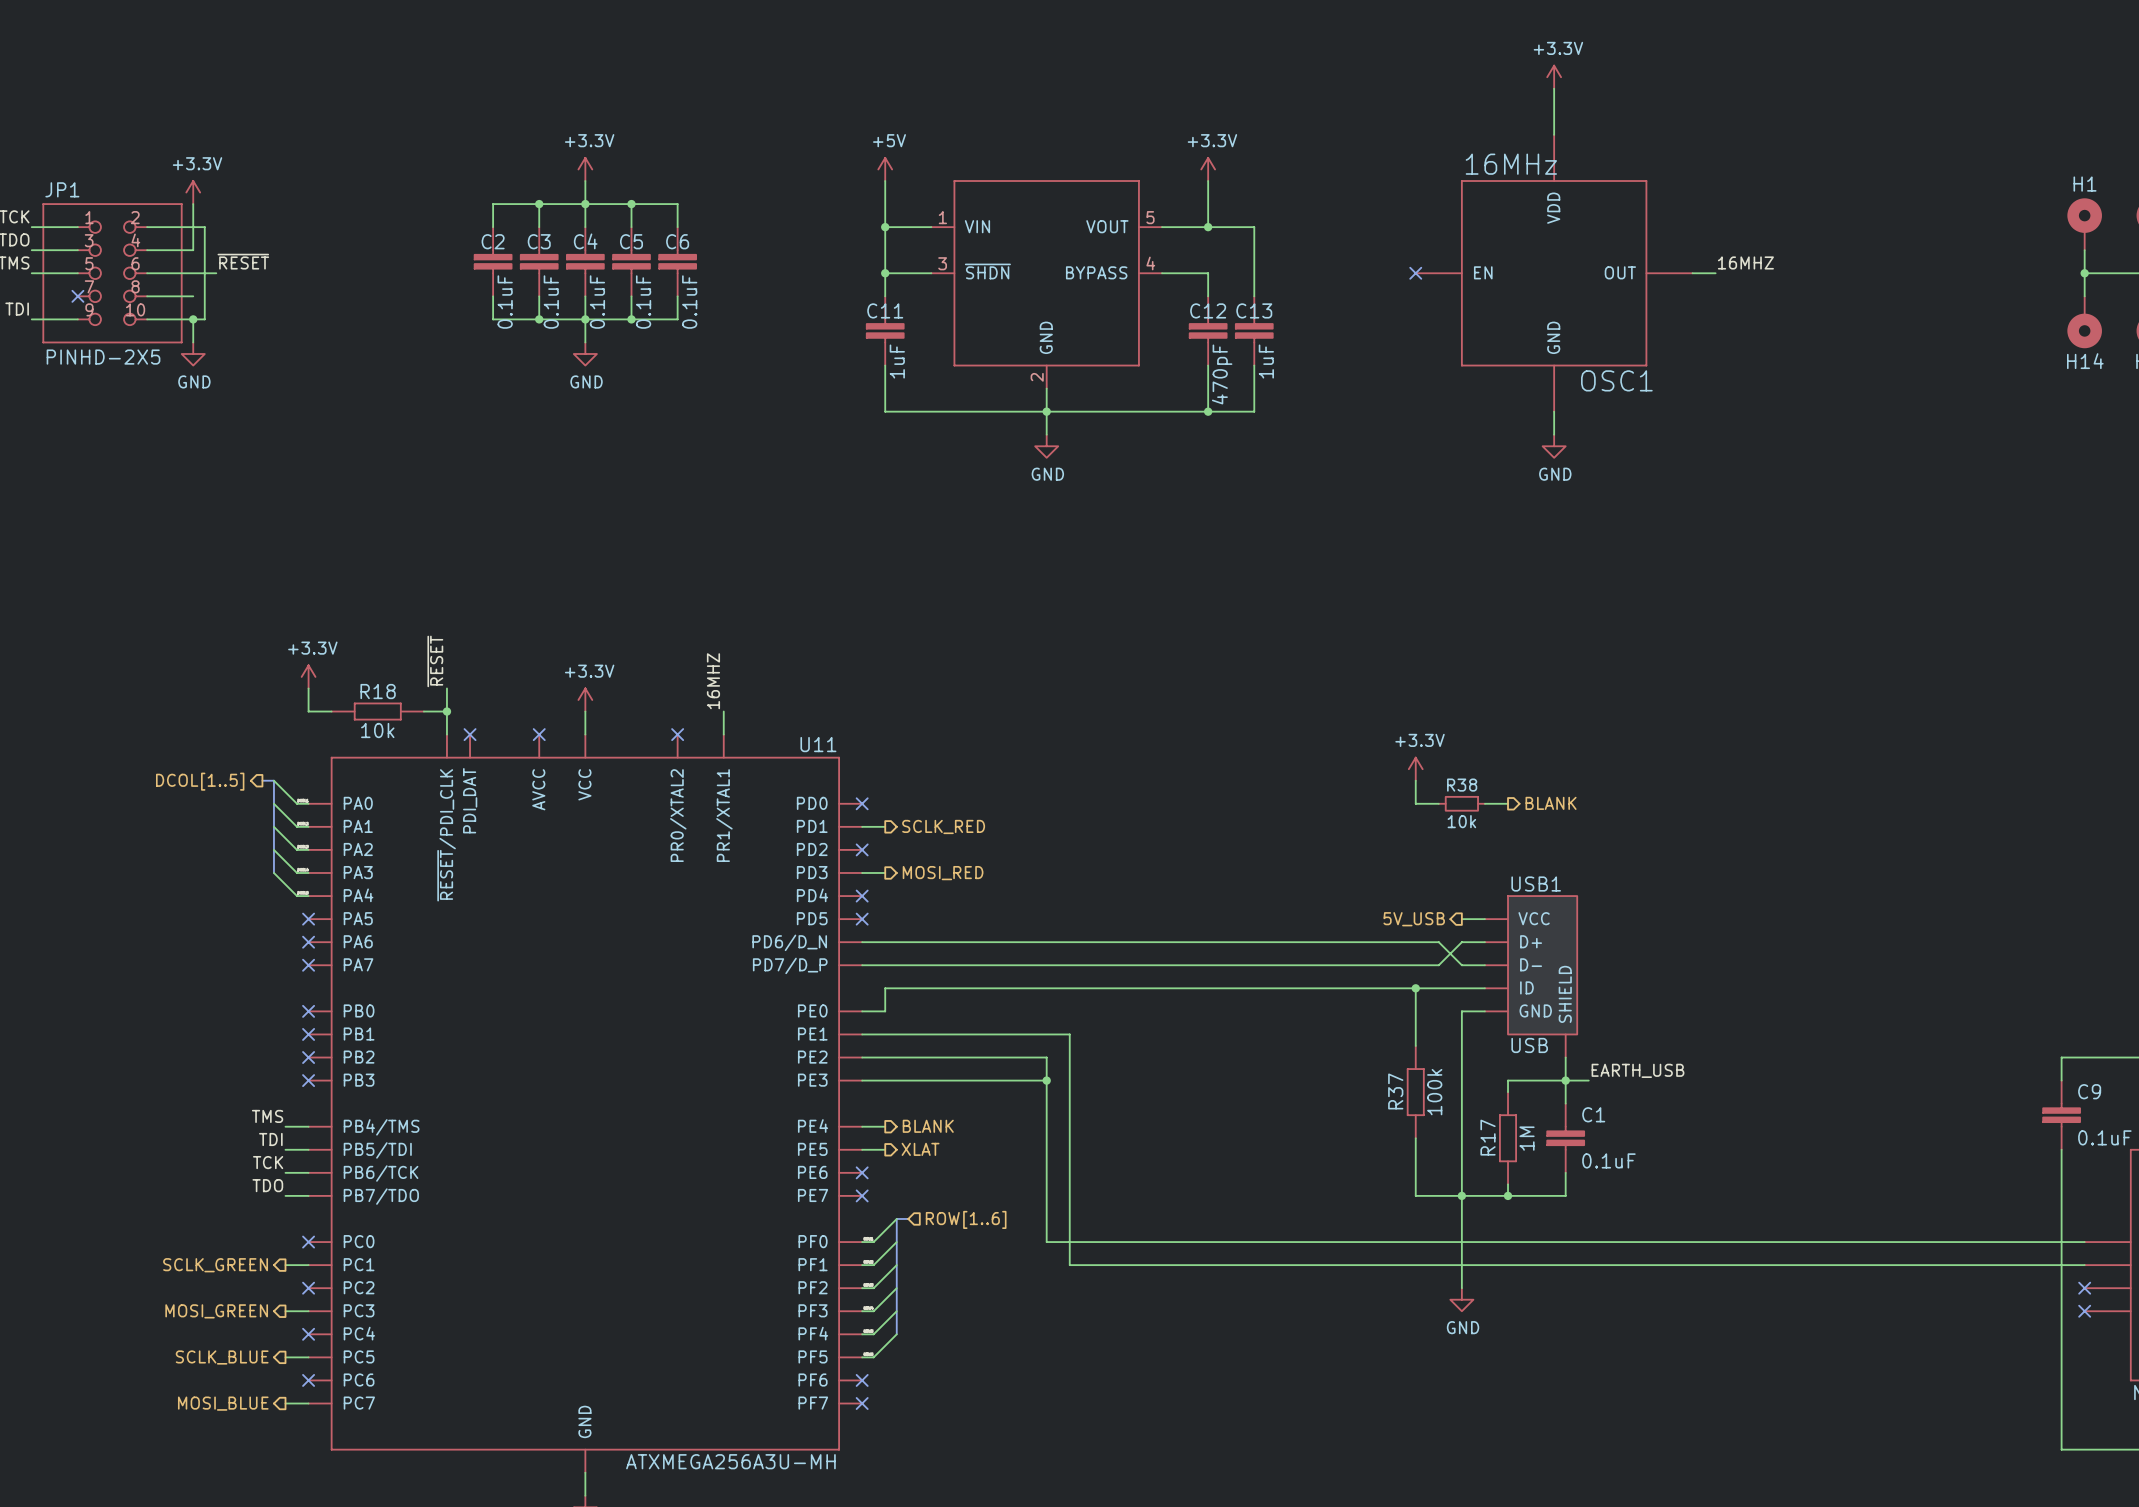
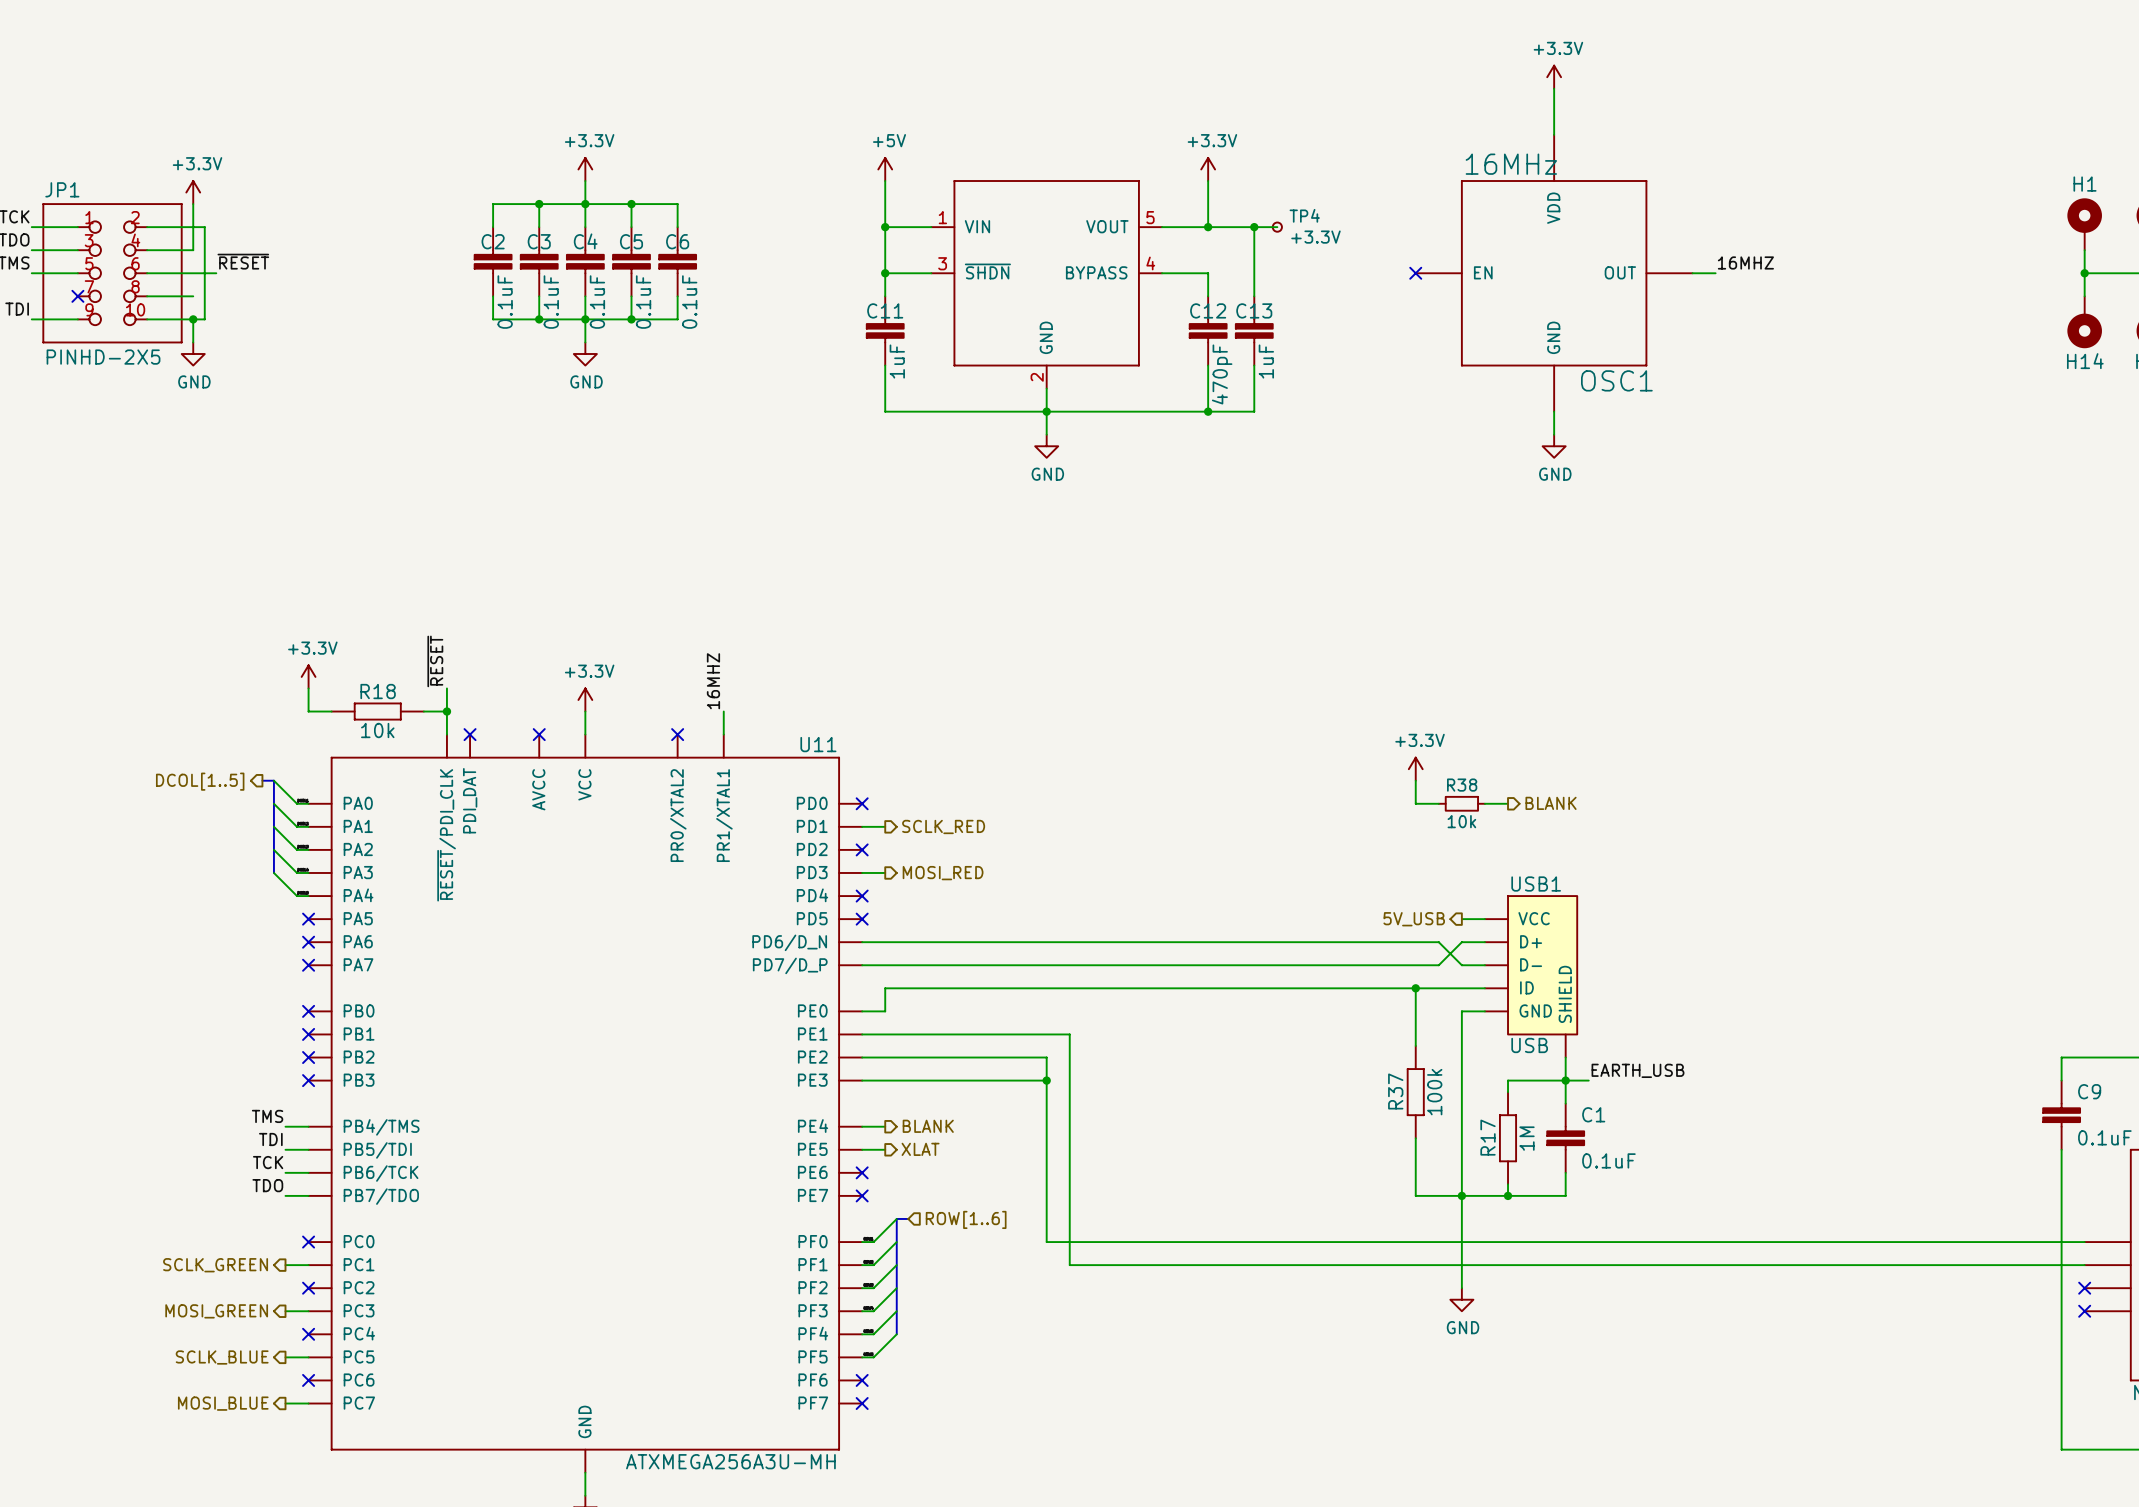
wire: none -> (1254, 227) (1277, 227)
junction: none -> (1254, 227)
TP4: none -> +3.3V (1277, 227)

